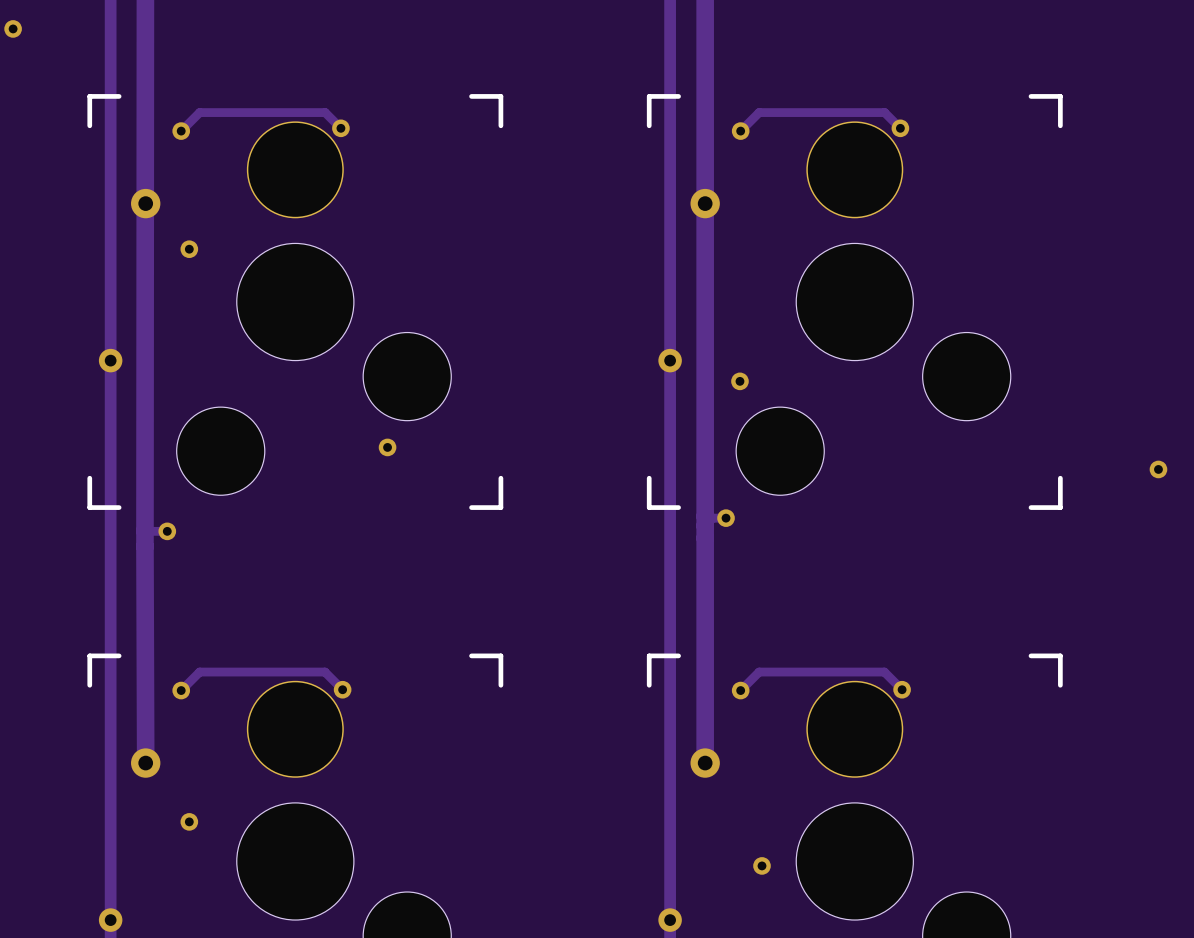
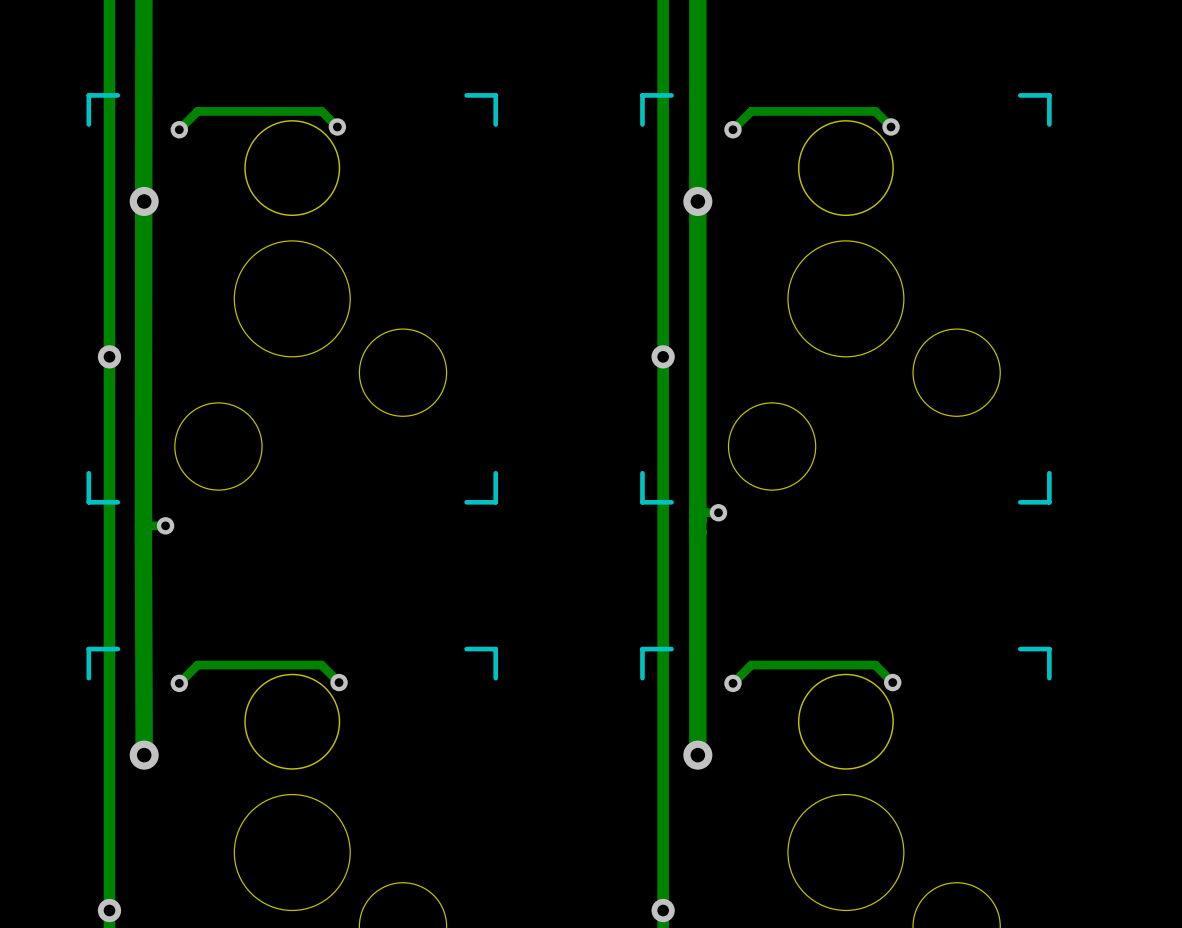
via: (13, 28) -> none
via: (189, 249) -> none
via: (739, 381) -> none
via: (387, 447) -> none
via: (1158, 469) -> none
via: (189, 821) -> none
via: (762, 865) -> none

